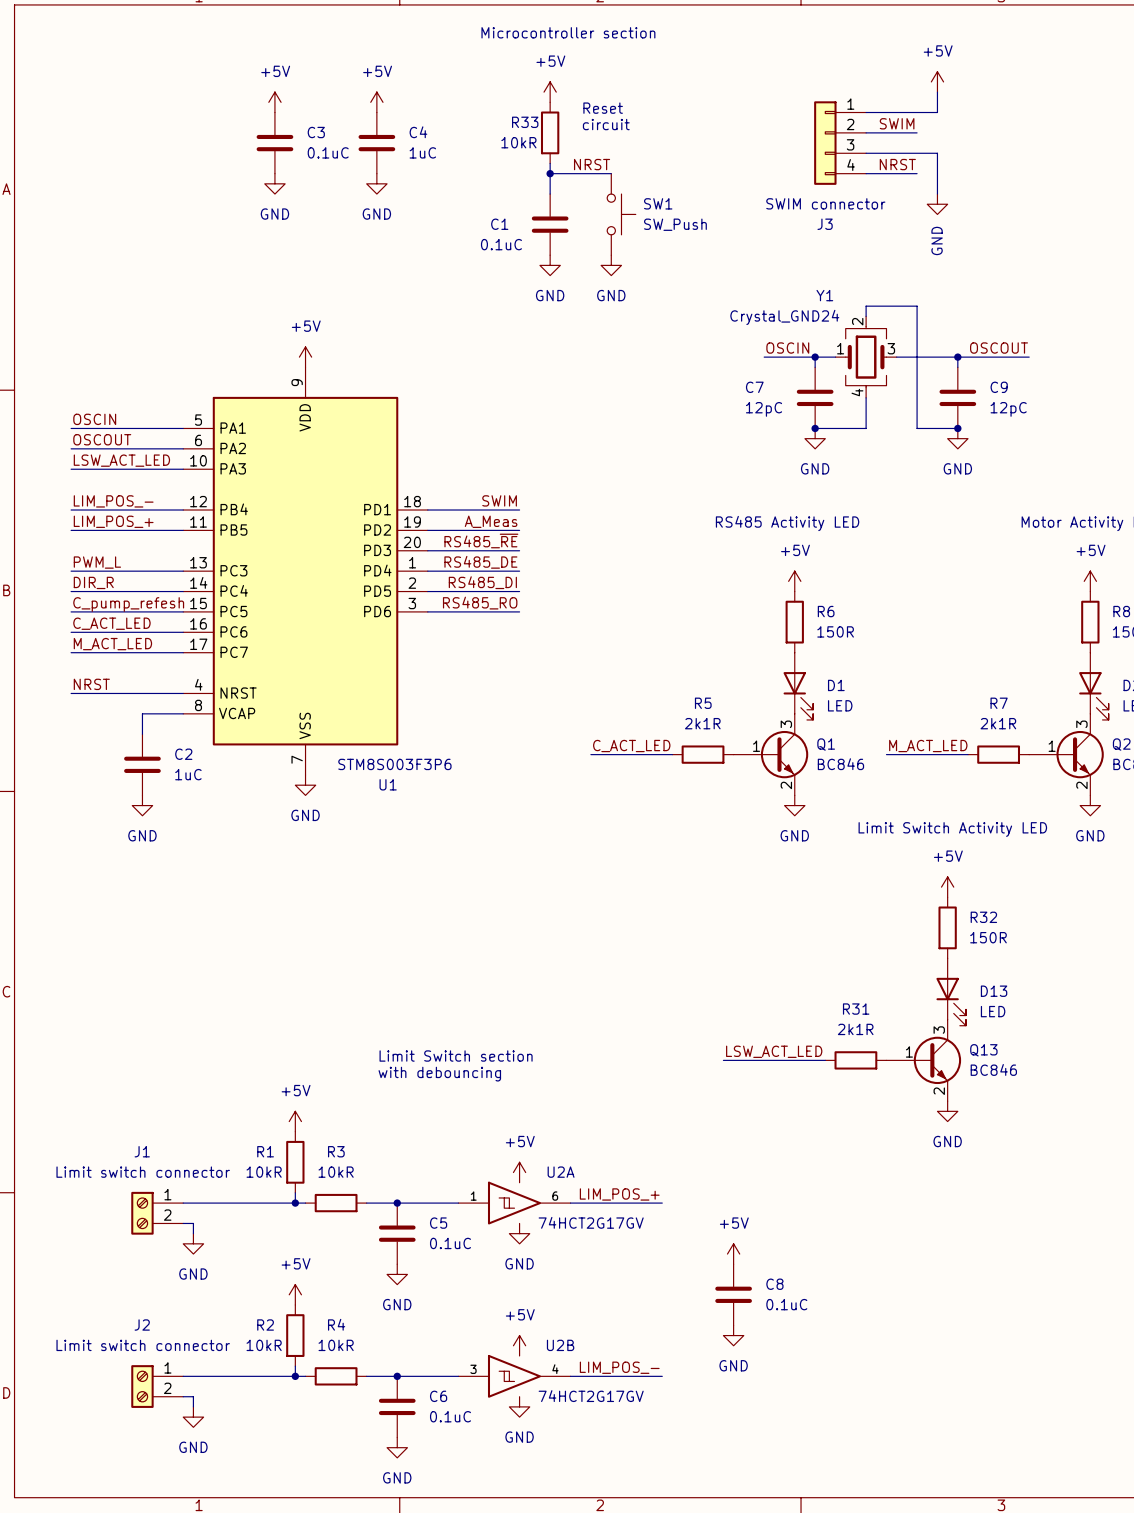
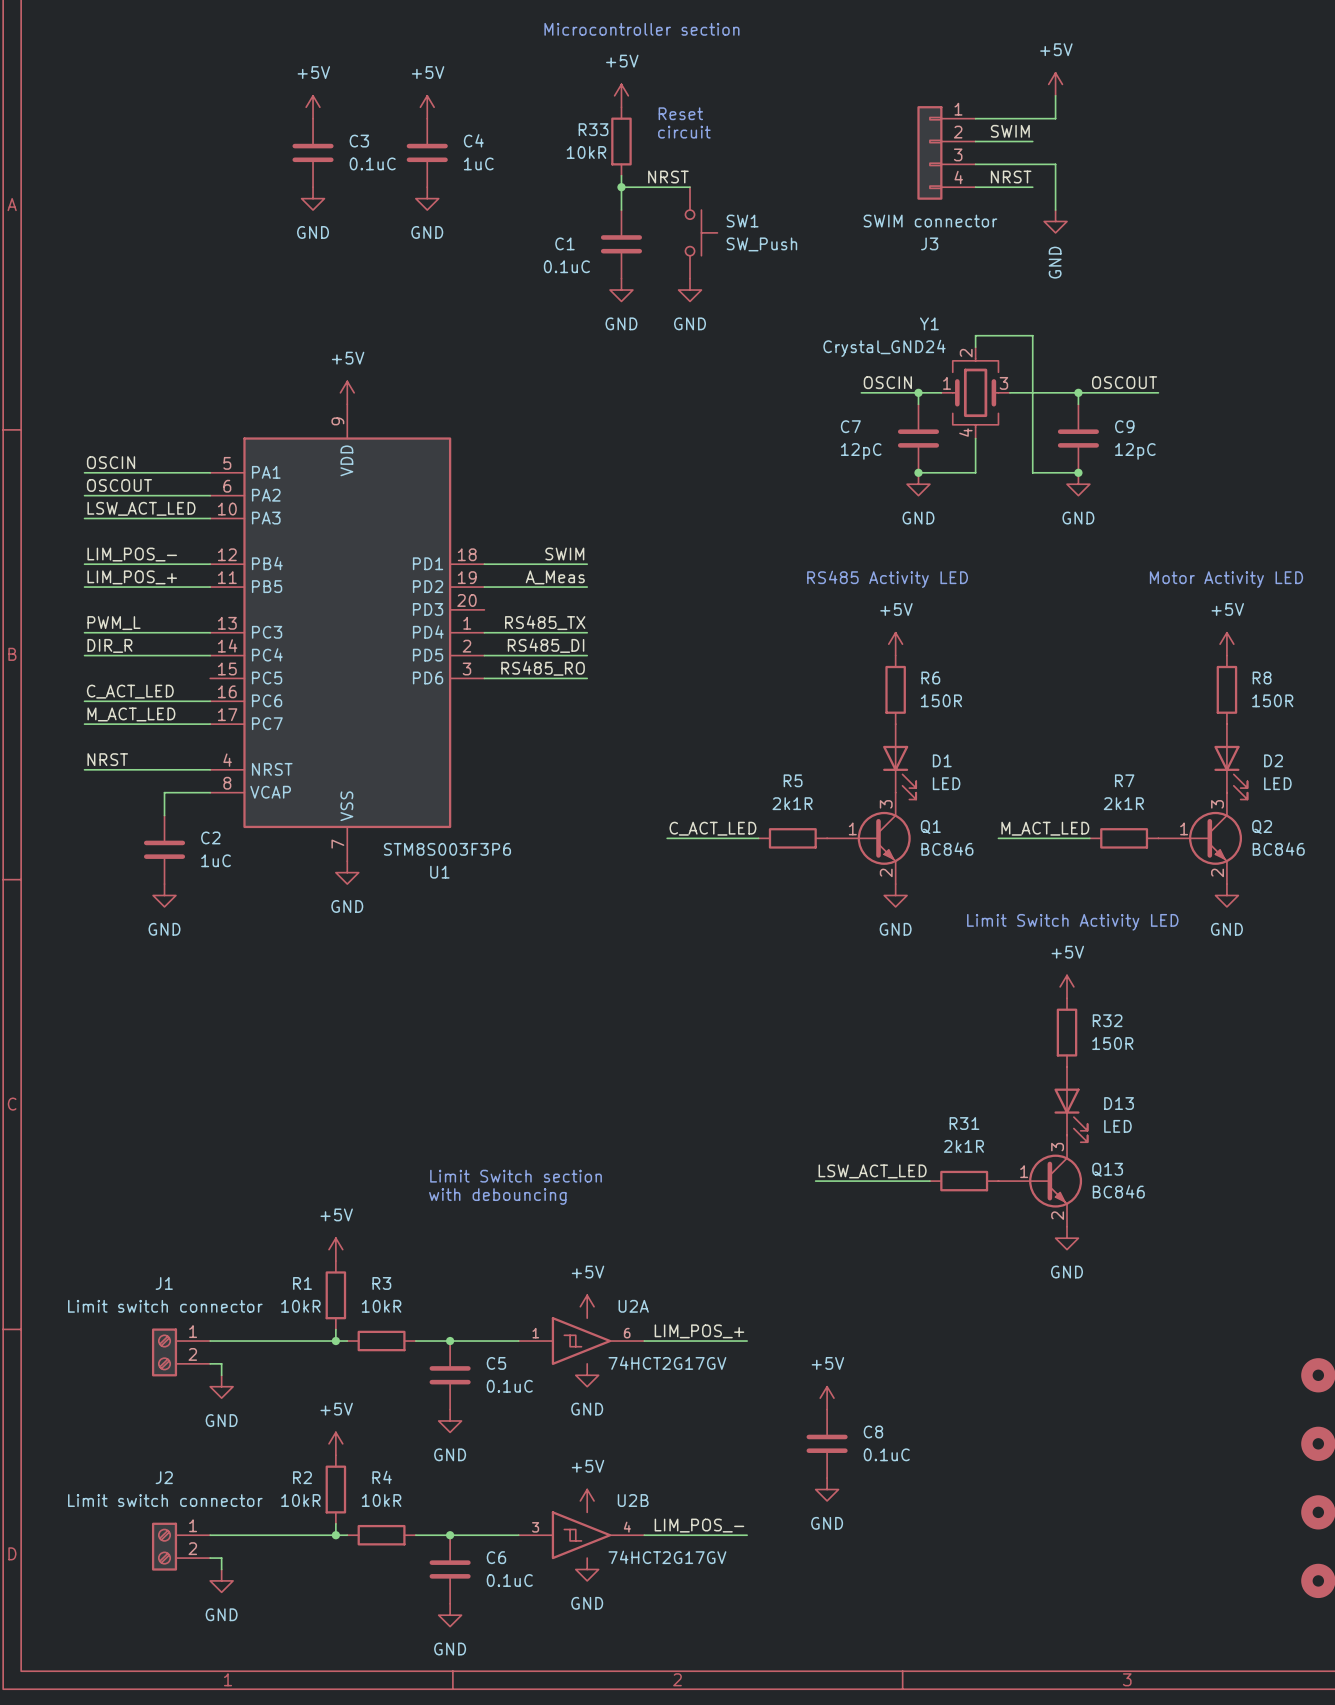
label: RS485_~{RE} (481, 540) -> none
wire: (427, 550) (519, 550) -> none
label: RS485_DE (480, 562) -> RS485_TX (545, 622)
label: C_pump_refesh (128, 604) -> none
wire: (71, 611) (183, 611) -> none

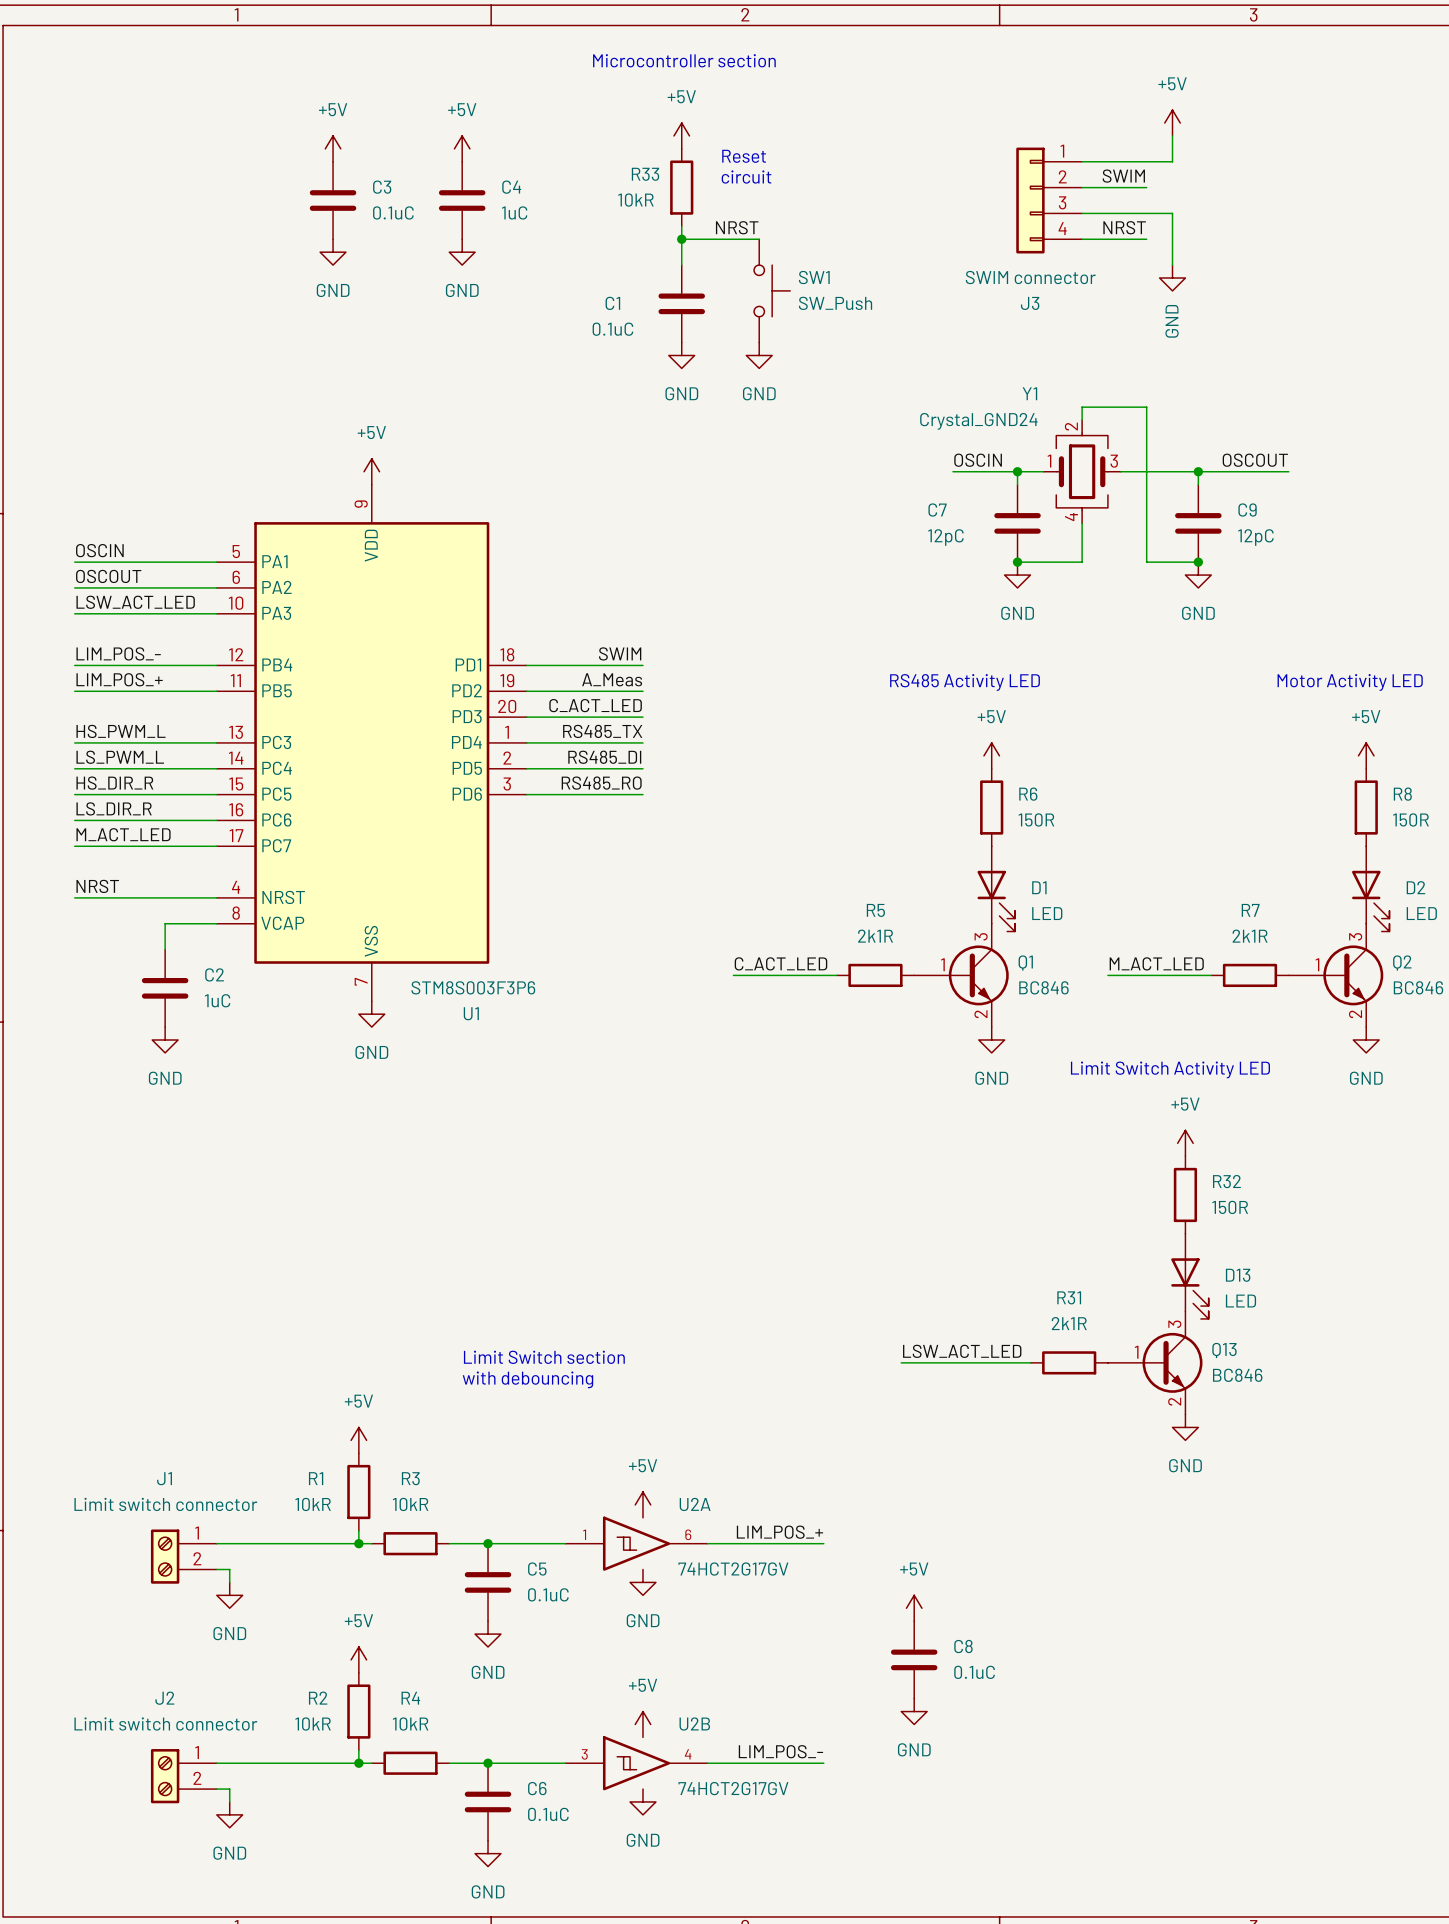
label: none -> C_ACT_LED (595, 705)
wire: none -> (526, 717) (642, 717)
label: PWM_L (114, 623) -> HS_PWM_L (121, 731)
label: DIR_R (109, 645) -> LS_PWM_L (120, 757)
label: none -> HS_DIR_R (114, 783)
wire: none -> (74, 794) (216, 794)
label: C_ACT_LED (130, 691) -> LS_DIR_R (114, 808)

